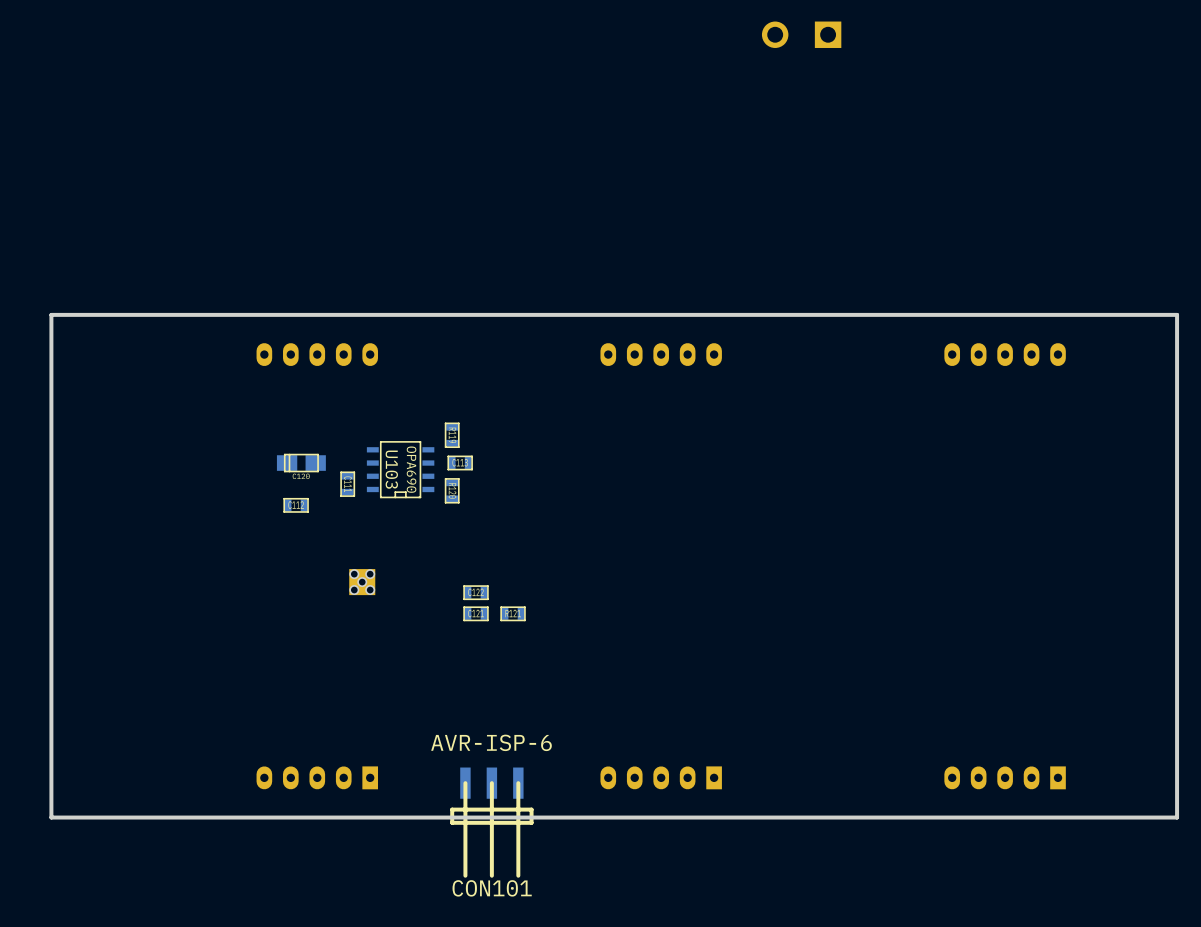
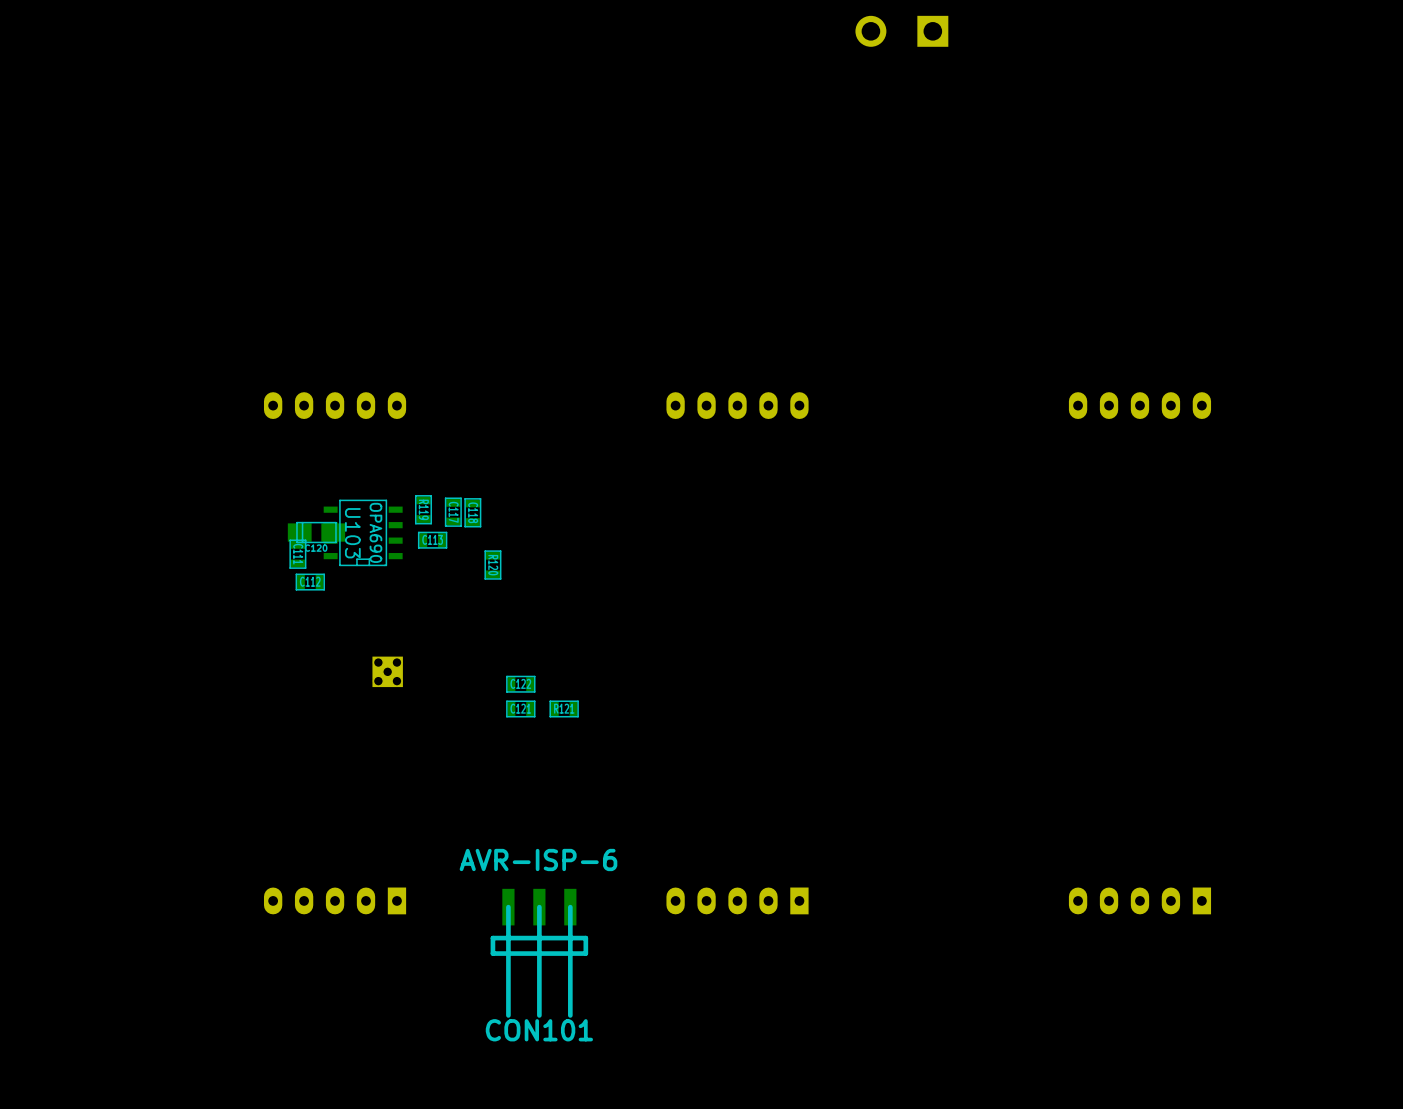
board edge: (1177, 314) (1177, 817) (51, 817) (51, 314) (1177, 314) -> none
R119 position: (452, 435) -> (423, 509)
C117: none -> (453, 512)
C118: none -> (472, 512)
C113 position: (460, 462) -> (432, 540)
U103 position: (400, 469) -> (363, 532)
C111 position: (347, 484) -> (297, 554)

